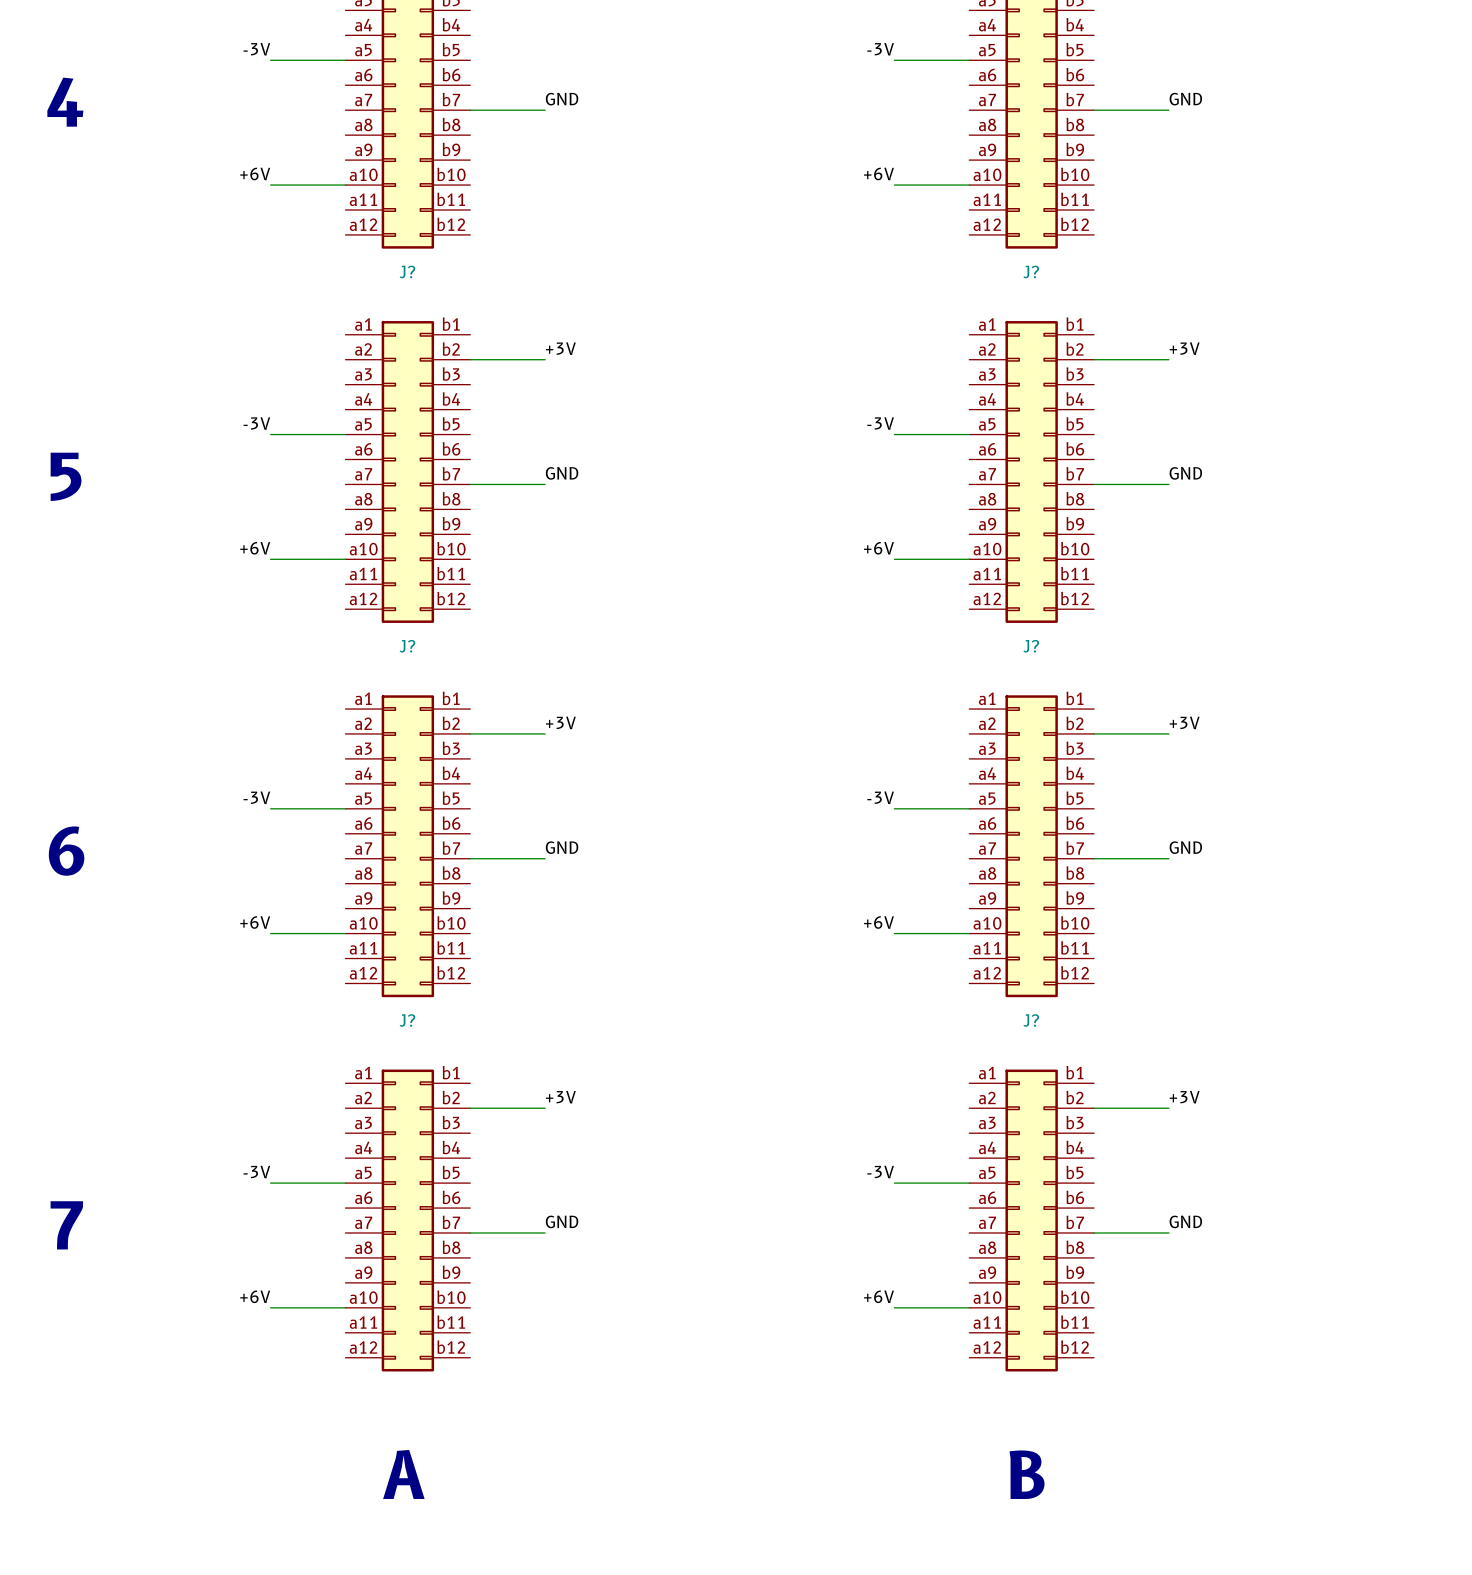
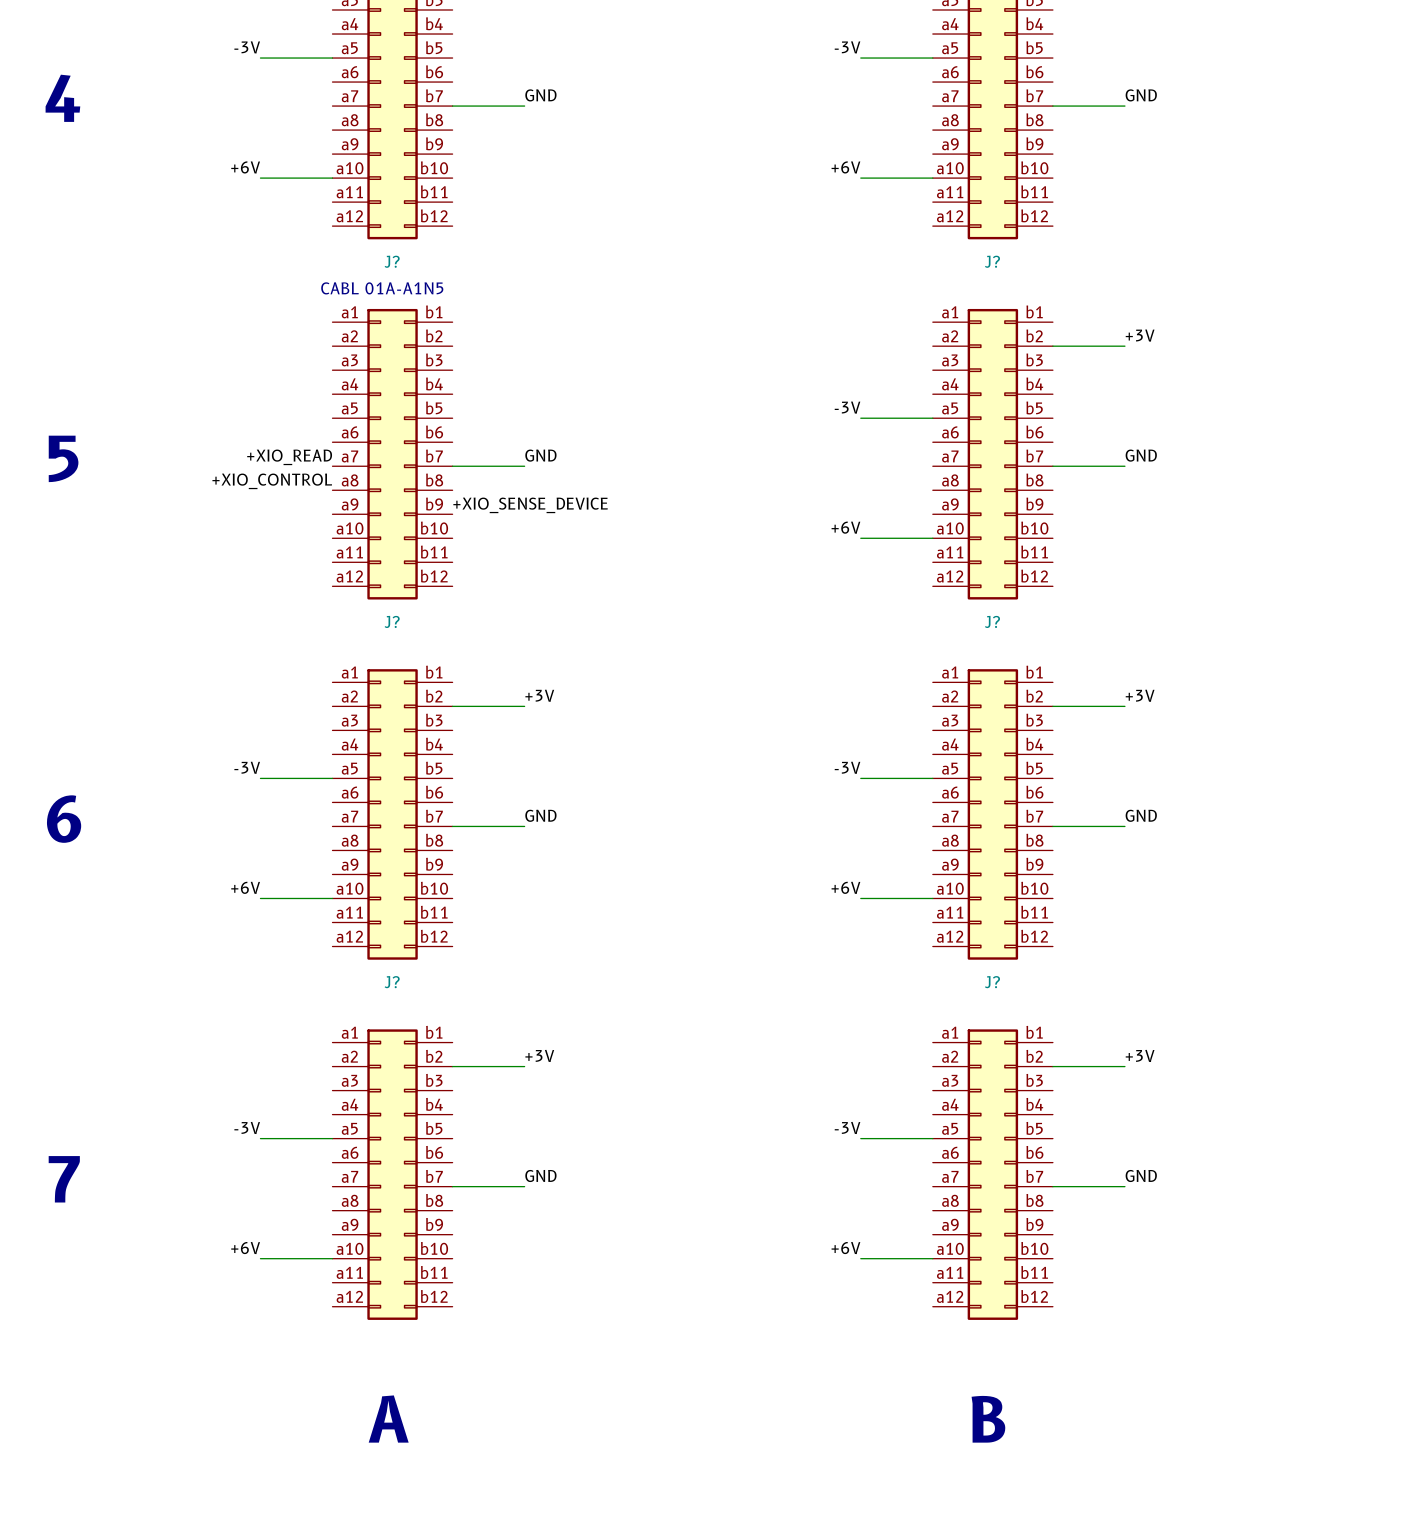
text: none -> CABL 01A-A1N5 (382, 288)
label: +3V (560, 348) -> none
wire: (470, 359) (545, 359) -> none
label: -3V (256, 423) -> none
wire: (270, 434) (345, 434) -> none
label: none -> +XIO_READ (289, 457)
label: none -> +XIO_CONTROL (272, 481)
label: none -> +XIO_SENSE_DEVICE (530, 505)
label: +6V (255, 548) -> none
wire: (270, 559) (345, 559) -> none

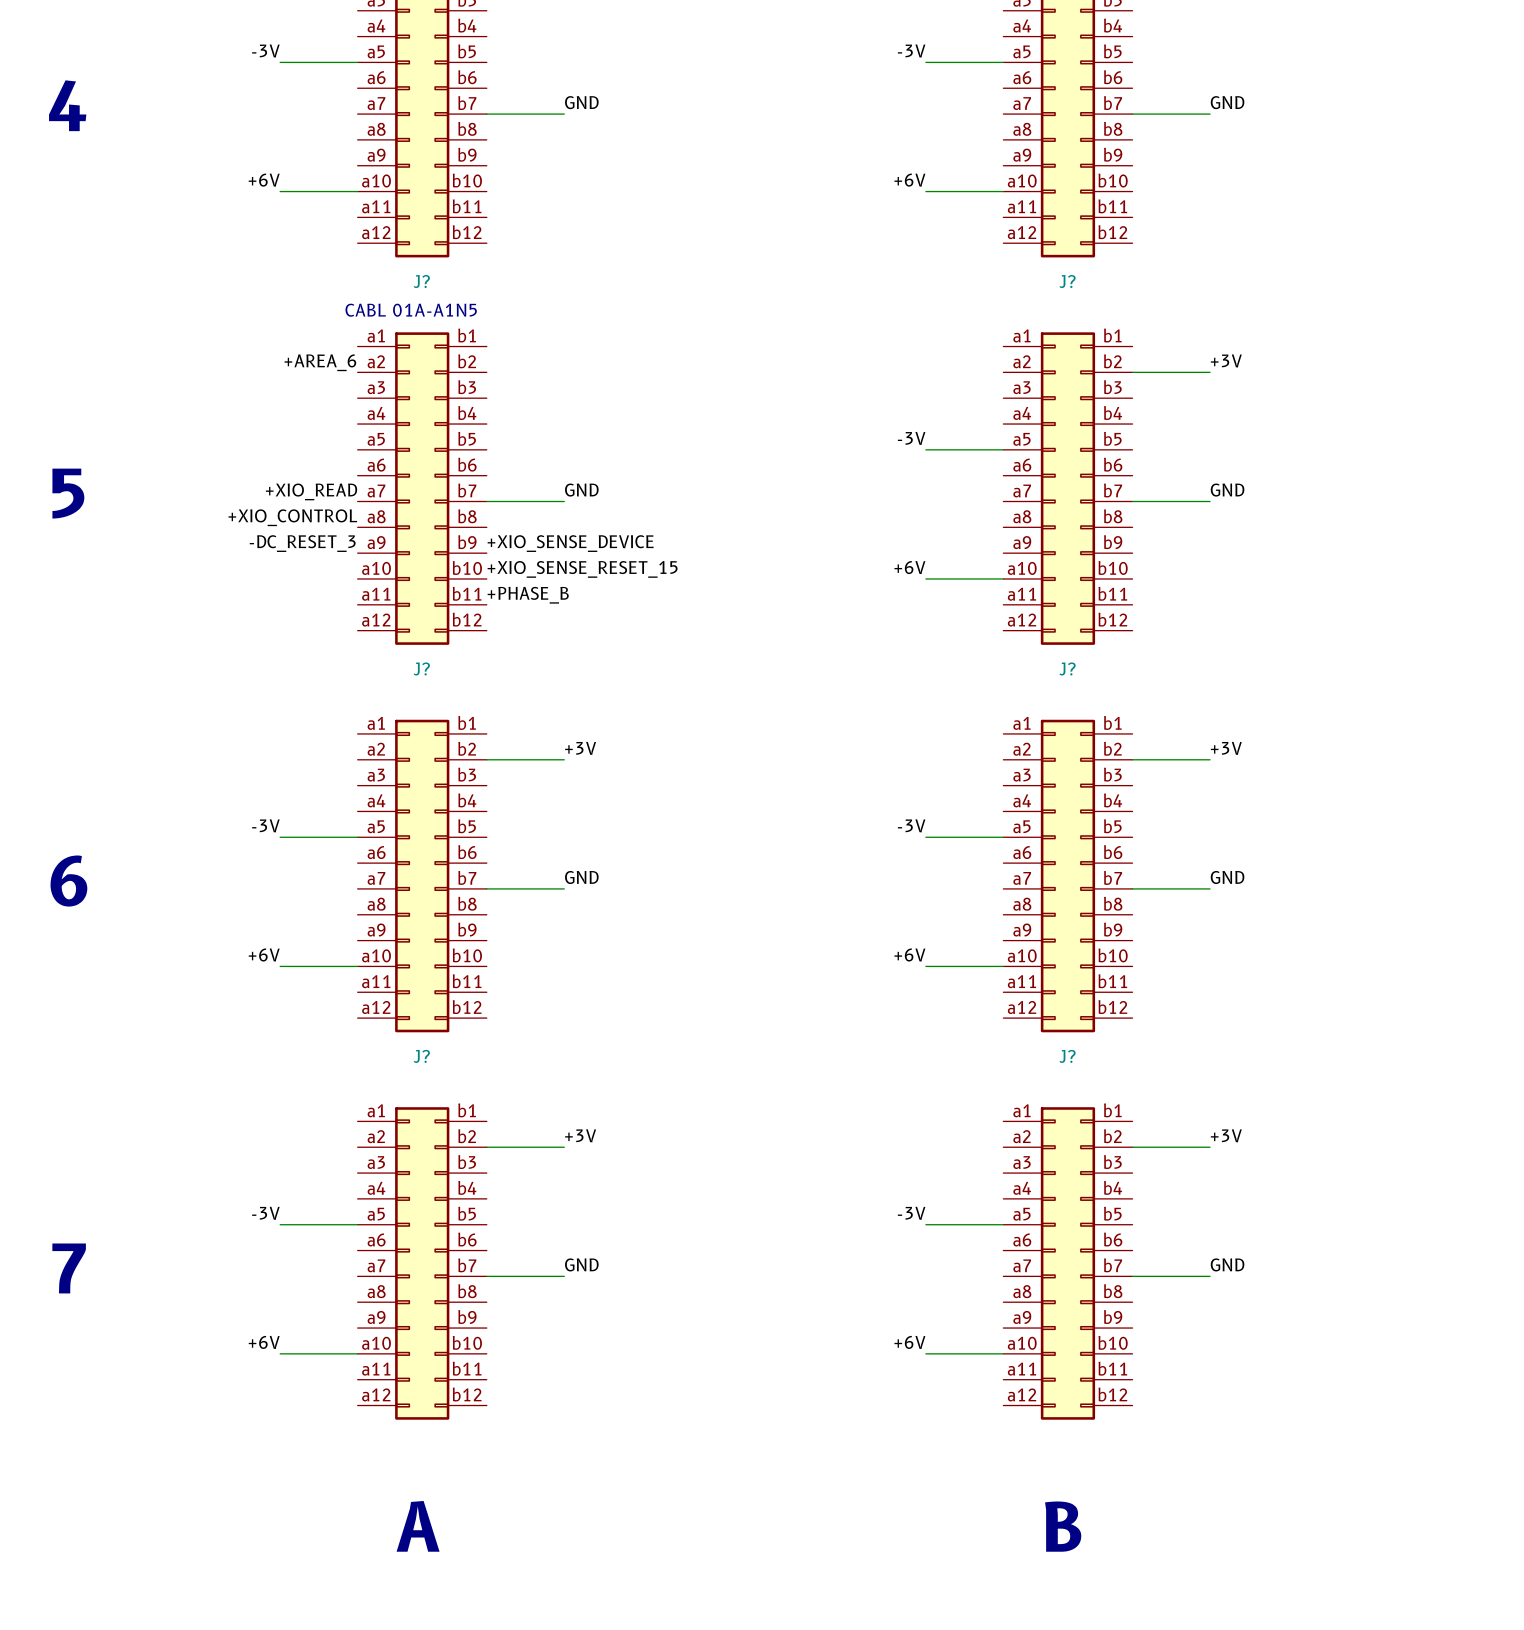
label: none -> +AREA_6 (320, 362)
label: none -> -DC_RESET_3 (302, 543)
label: none -> +XIO_SENSE_RESET_15 (582, 569)
label: none -> +PHASE_B (528, 595)

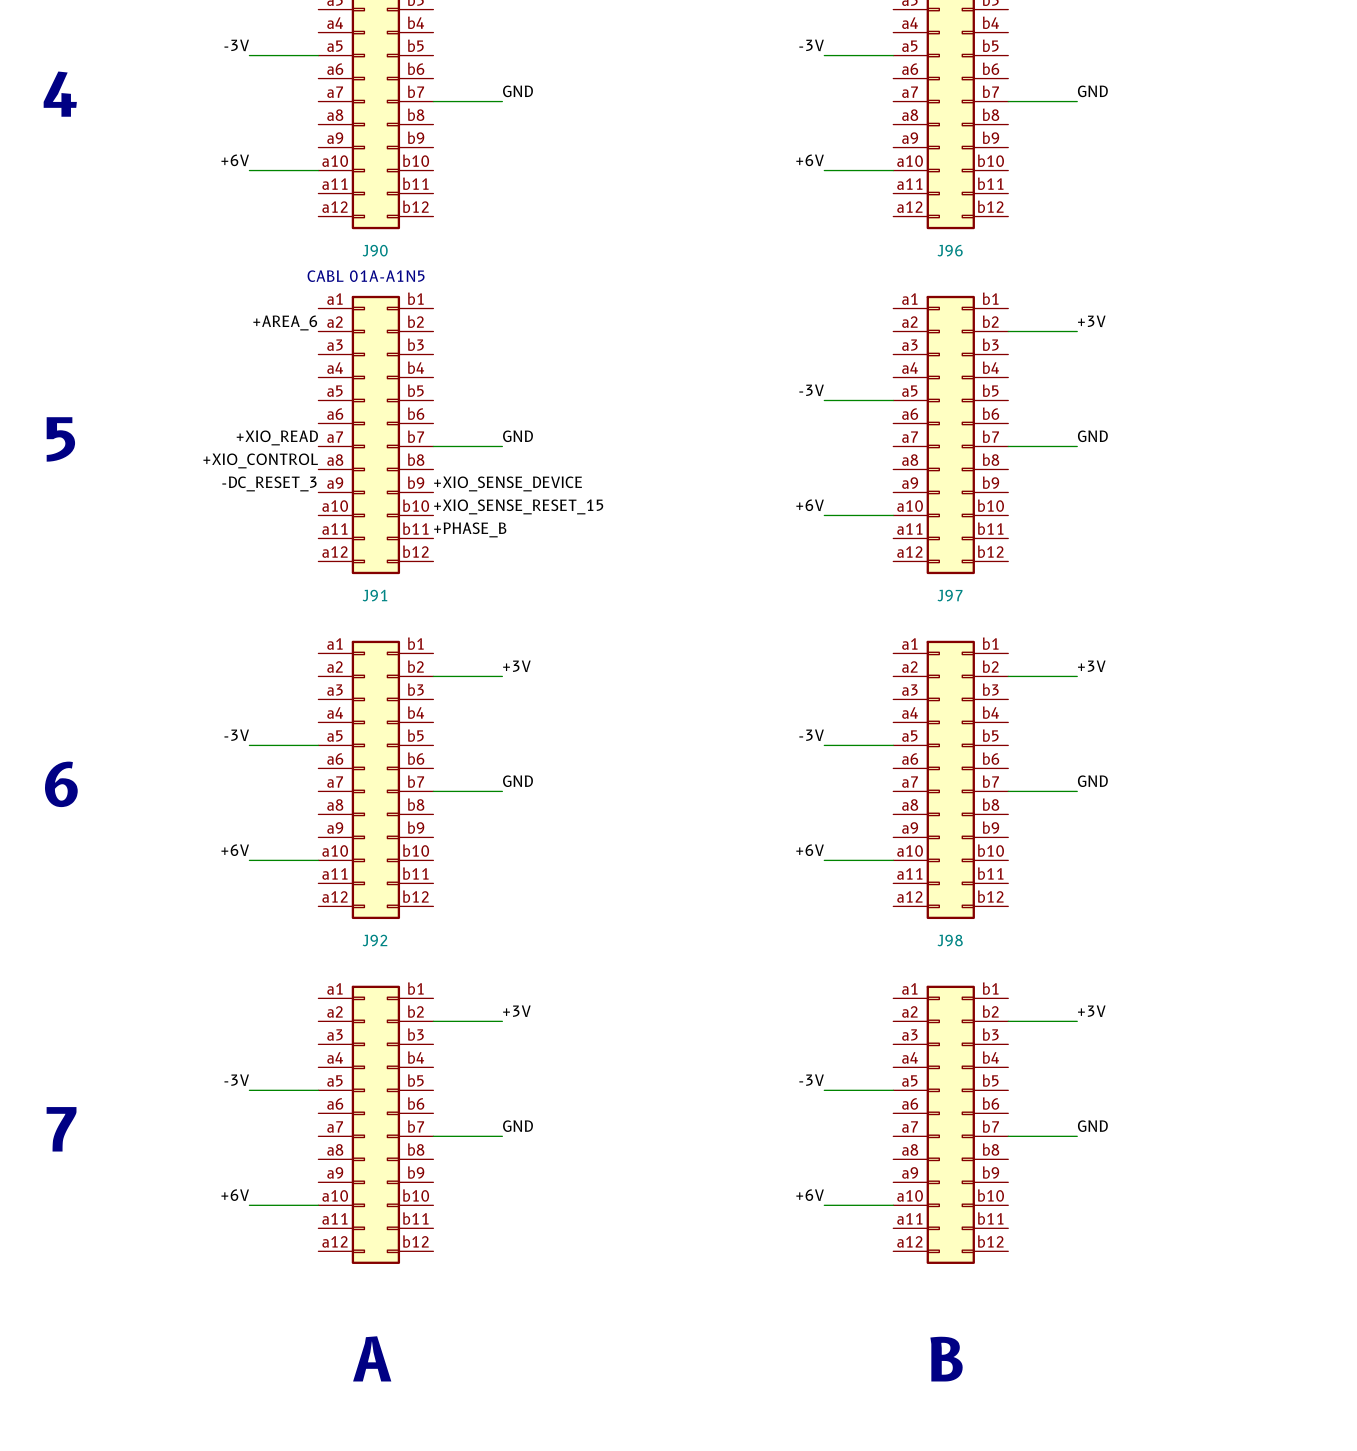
J? name: J? (421, 281) -> J90 (375, 250)
J? name: J? (1067, 281) -> J96 (950, 250)
J? name: J? (421, 668) -> J91 (374, 595)
J? name: J? (1067, 668) -> J97 (950, 595)
J? name: J? (421, 1056) -> J92 (374, 940)
J? name: J? (1067, 1056) -> J98 (950, 940)

